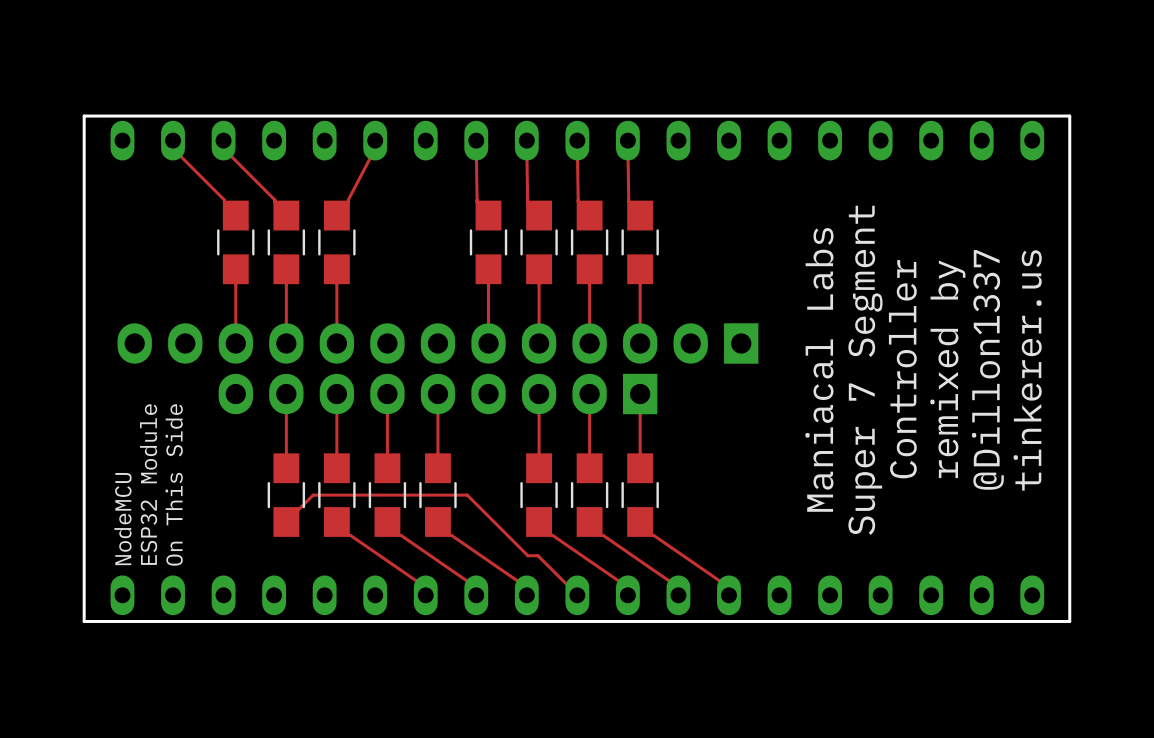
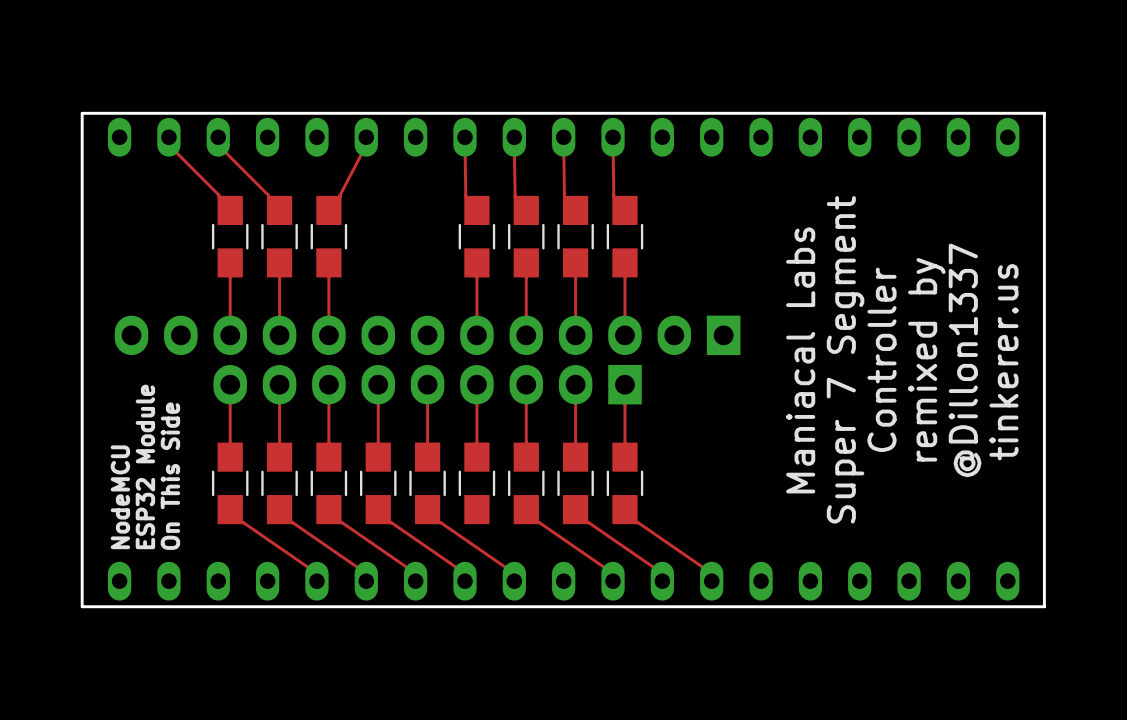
track: none -> (230, 384) (230, 457)
track: none -> (476, 384) (476, 457)
part: none -> (230, 483)
part: none -> (476, 483)
track: none -> (230, 509) (241, 522) (316, 573) (316, 581)
track: (286, 521) (313, 495) (467, 495) (527, 555) (538, 555) (577, 595) -> none
track: none -> (290, 522) (366, 573) (366, 581)

